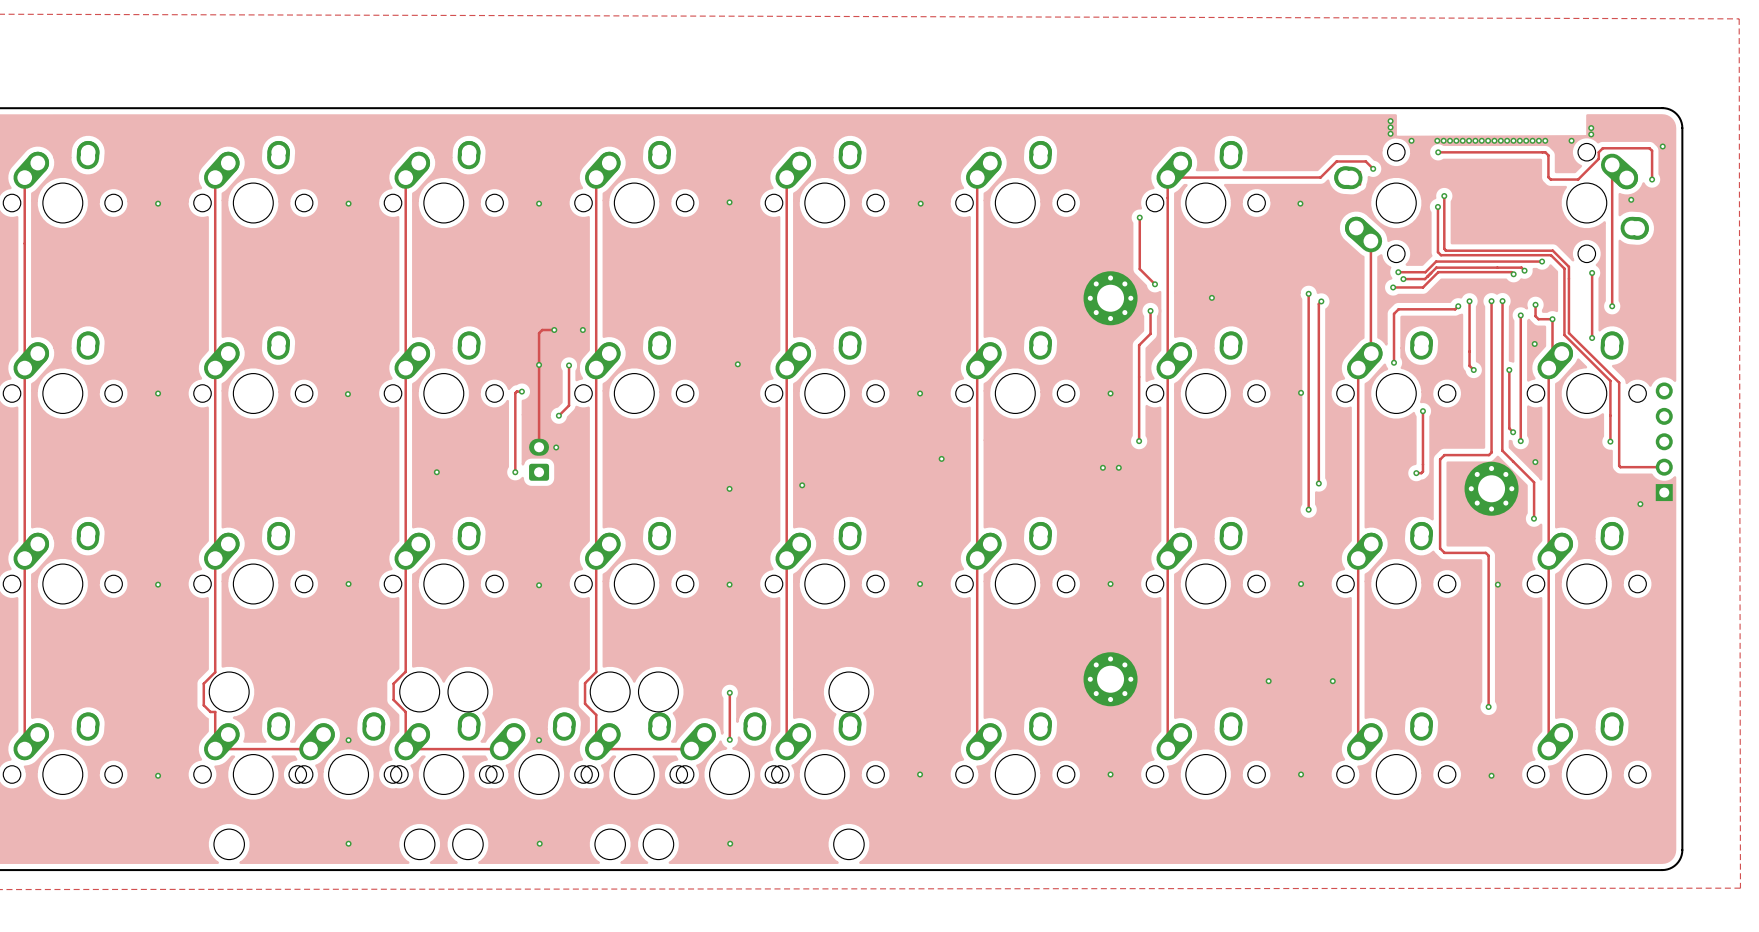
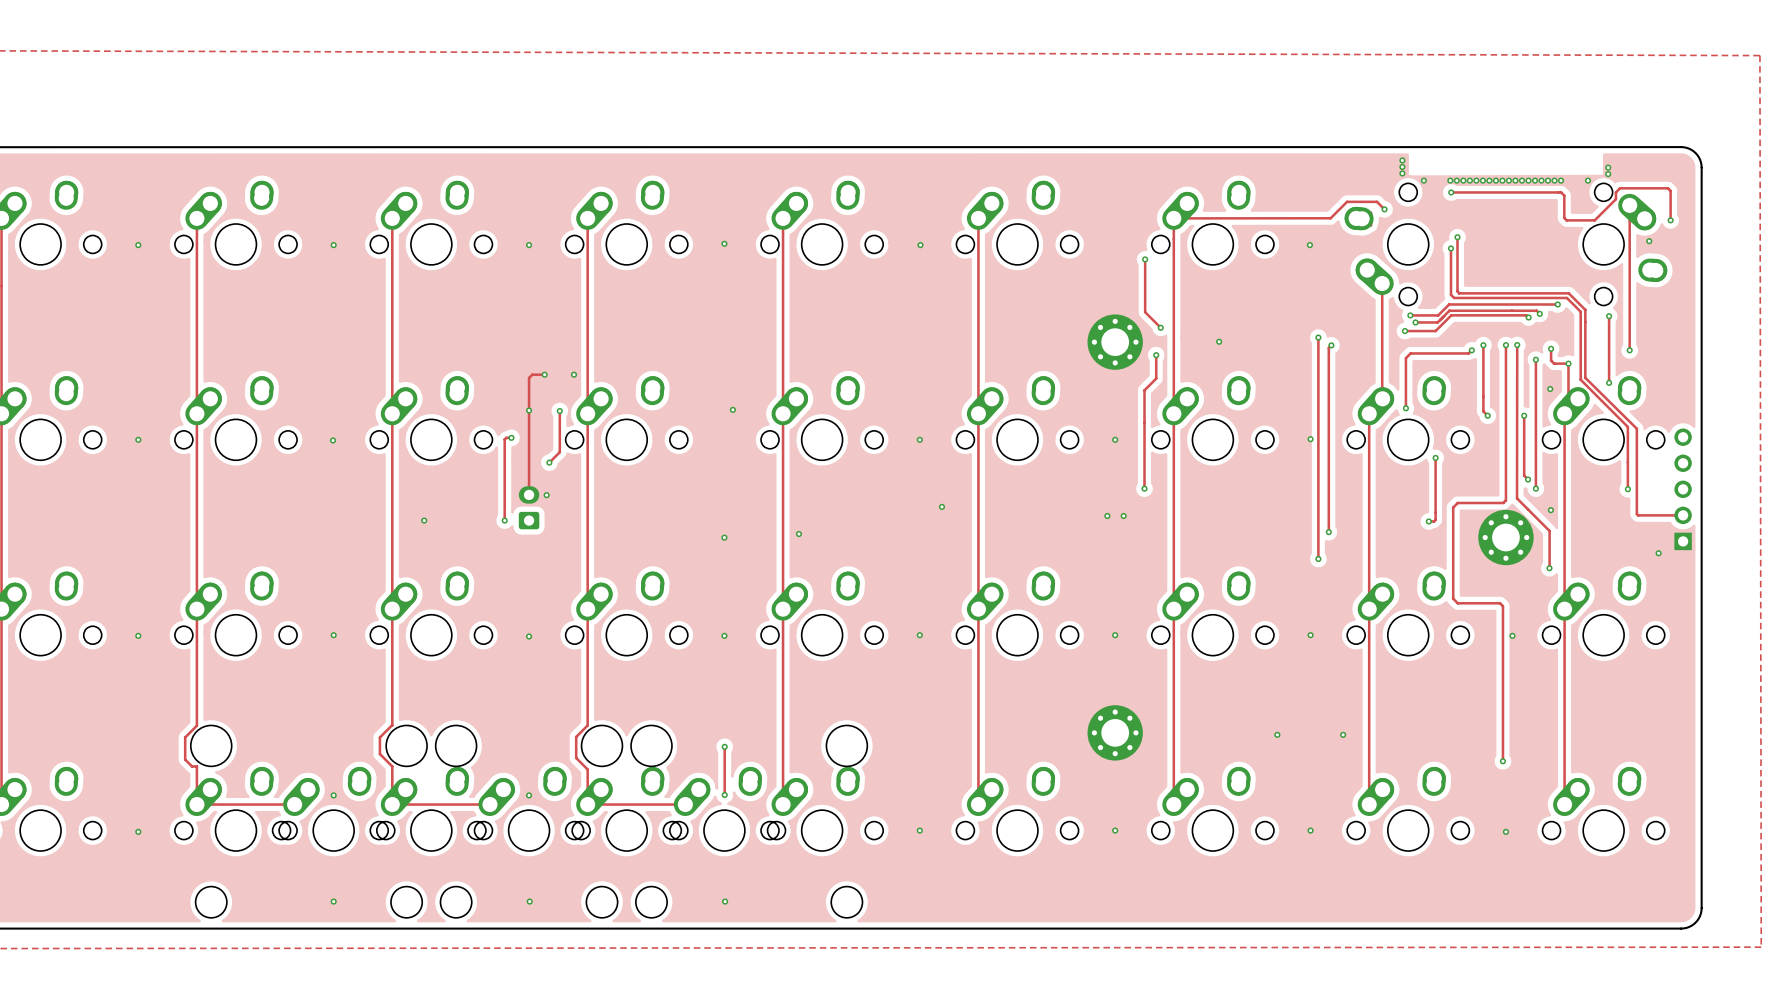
via: (1662, 146) -> none

